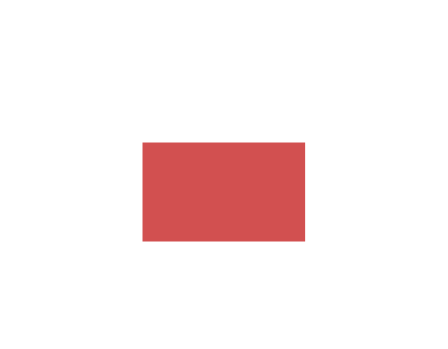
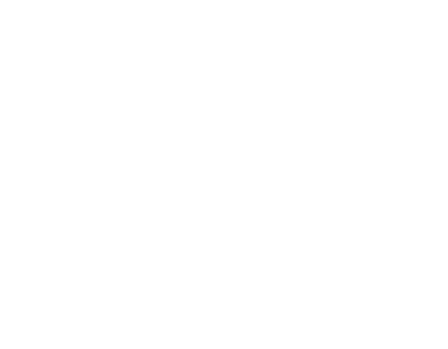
part: (223, 192) -> none

